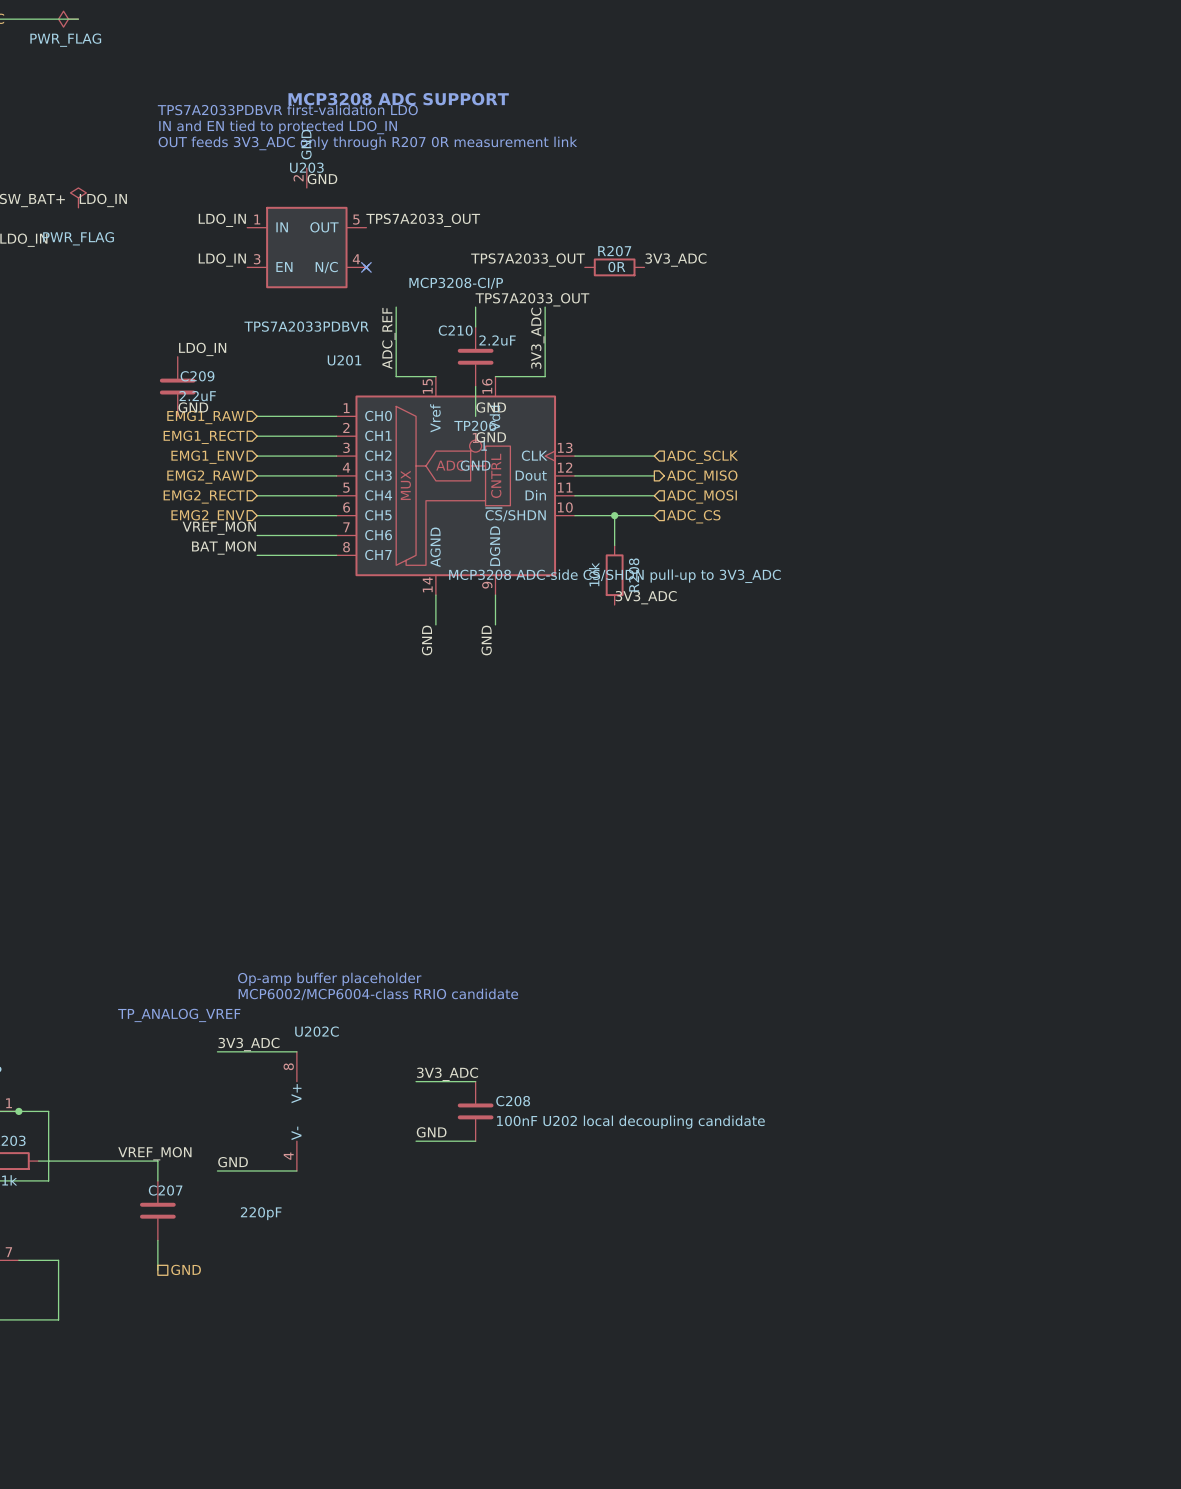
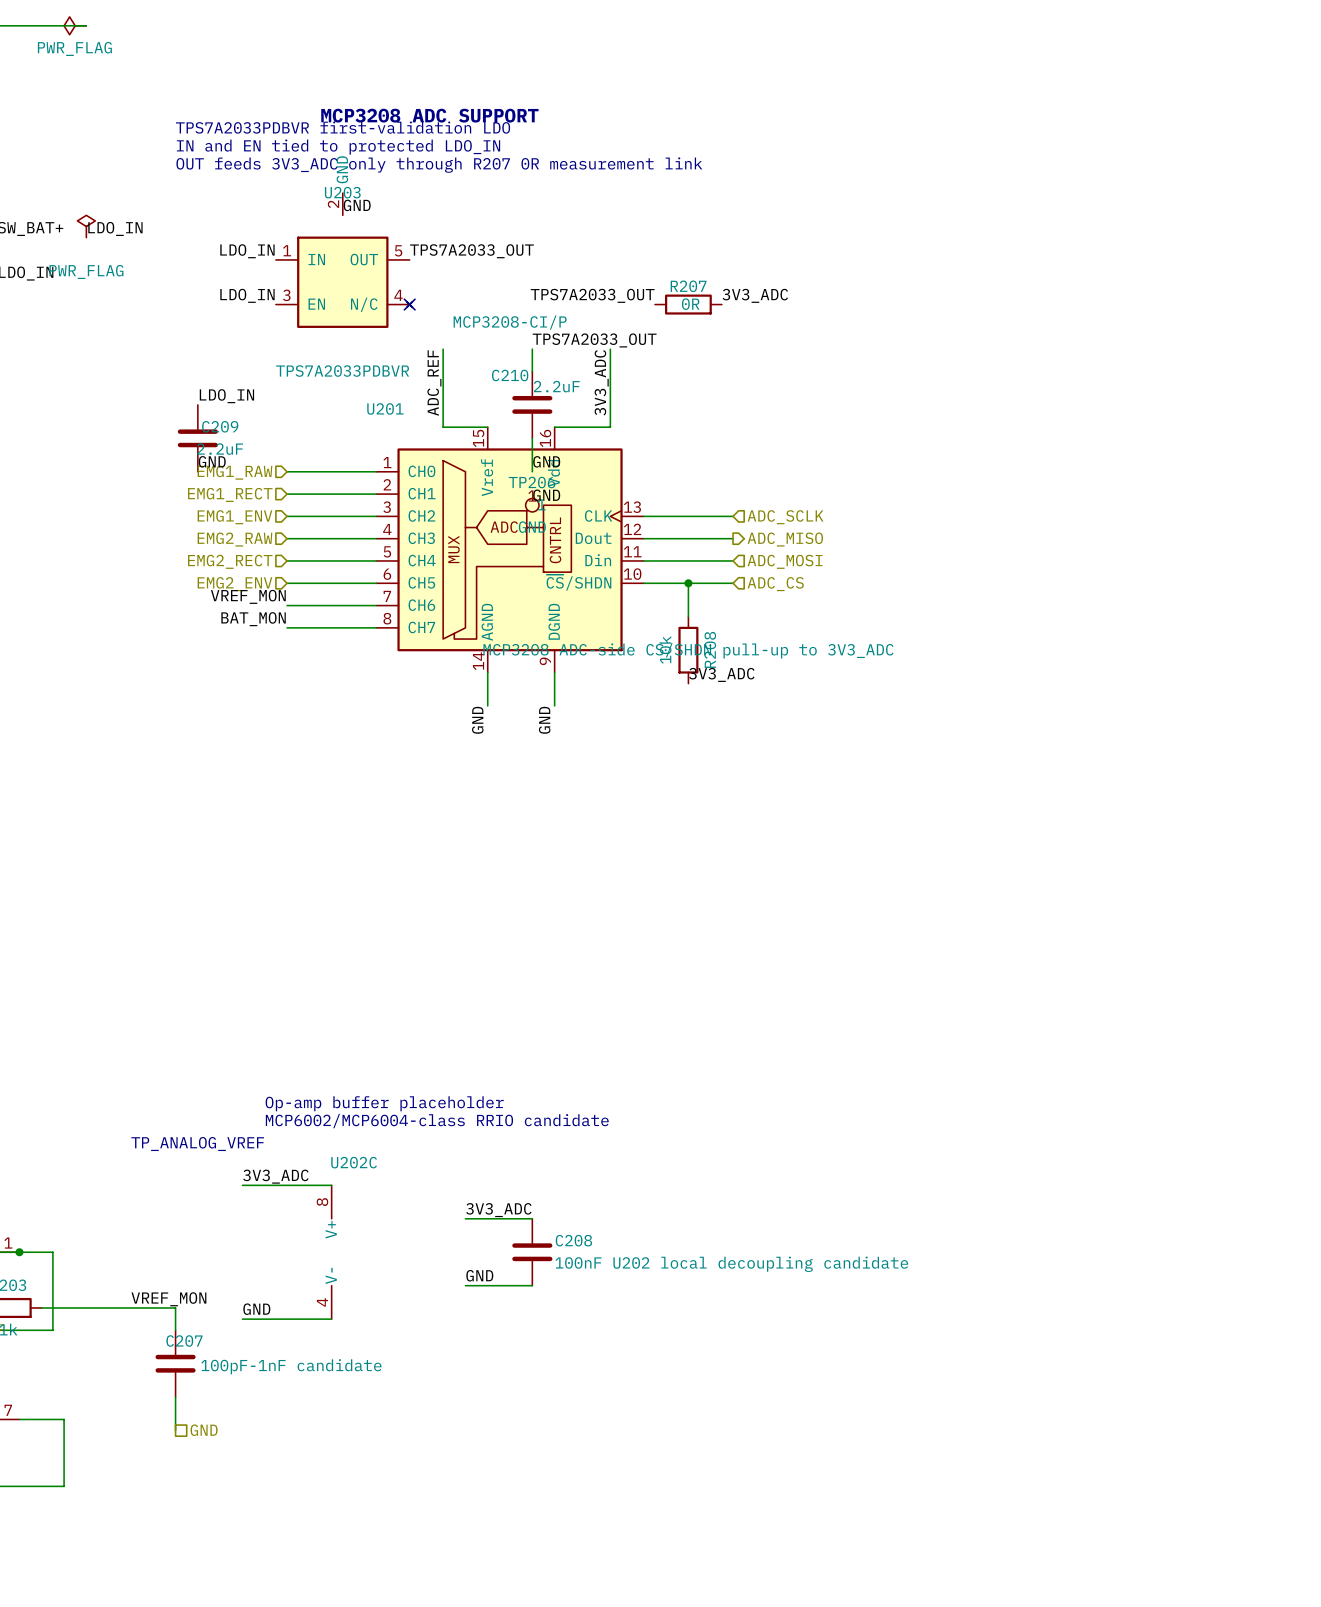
C207 value: 220pF (261, 1213) -> 100pF-1nF candidate (291, 1366)

